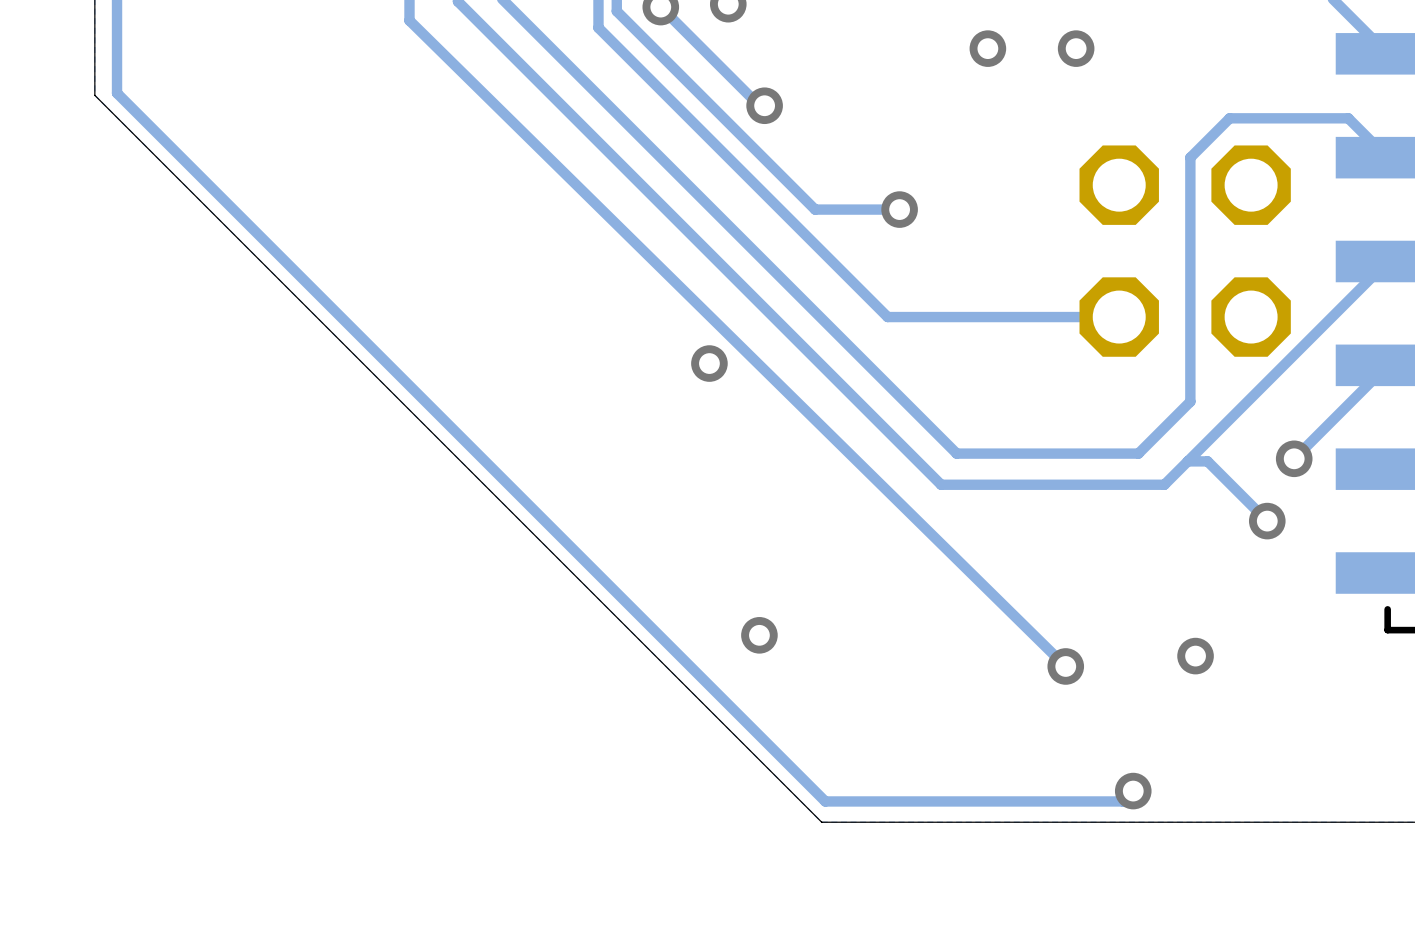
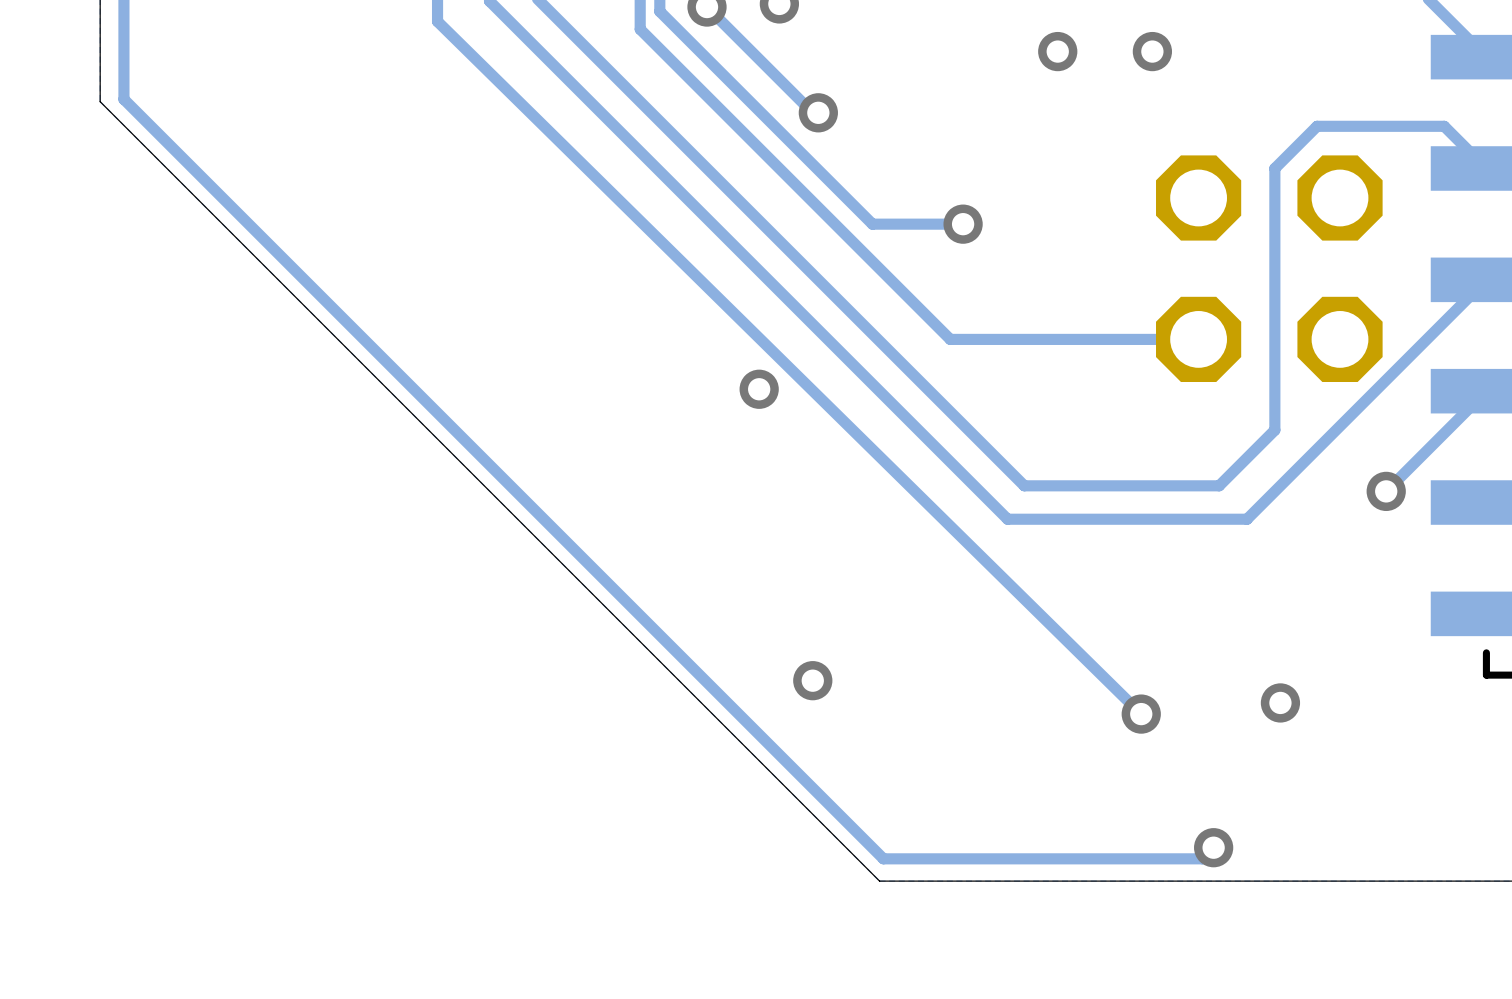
track: (1187, 461) (1207, 461) (1267, 521) -> none
via: (1267, 521) -> none

